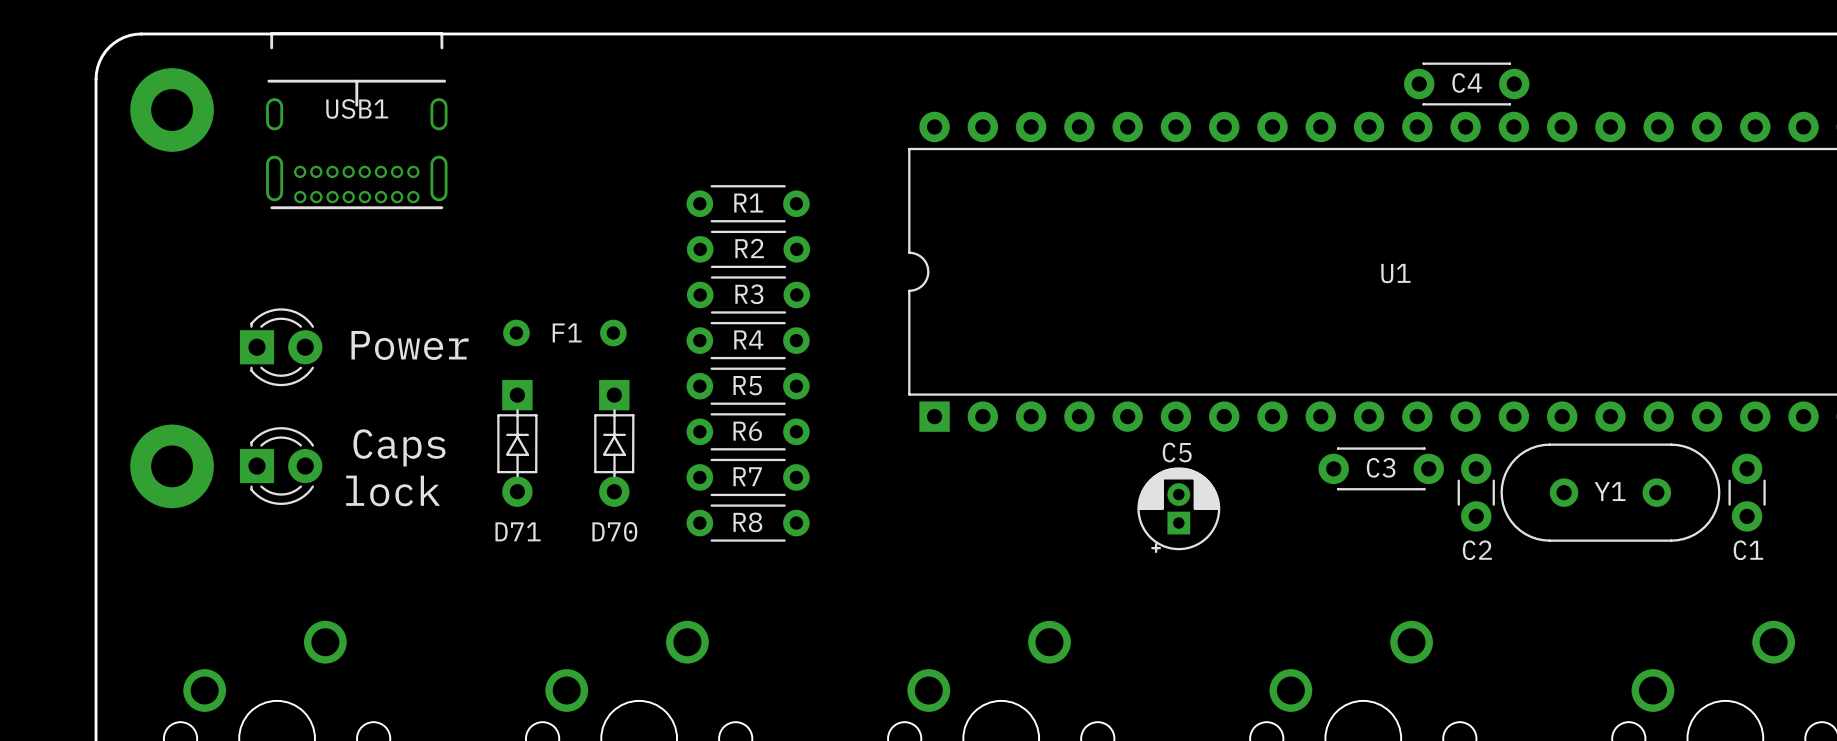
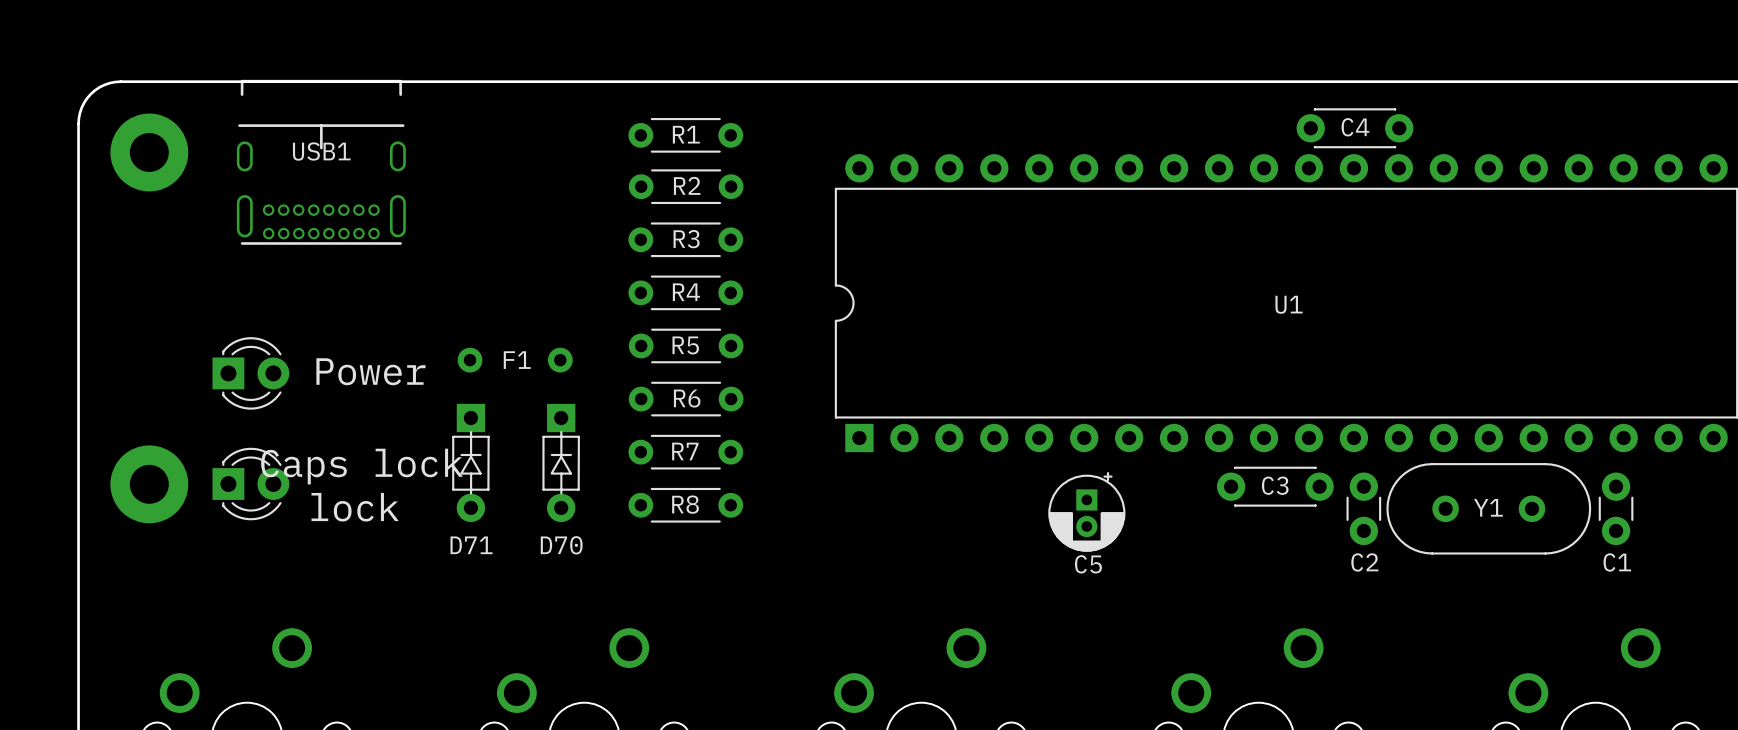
R1: none -> (685, 135)
R1 name: R1 (748, 203) -> R3 (686, 239)
R2 position: (748, 249) -> (686, 186)
R3: (748, 294) -> none
R4 position: (748, 340) -> (685, 292)
R6: none -> (686, 399)
R5 position: (748, 386) -> (686, 345)
R6 name: R6 (747, 431) -> R7 (685, 451)
part value: Caps (399, 447) -> Caps lock (362, 466)
R7: (748, 477) -> none
C5 rotation: 0° (1178, 510) -> 180° (1086, 511)
R8 position: (748, 523) -> (685, 505)

